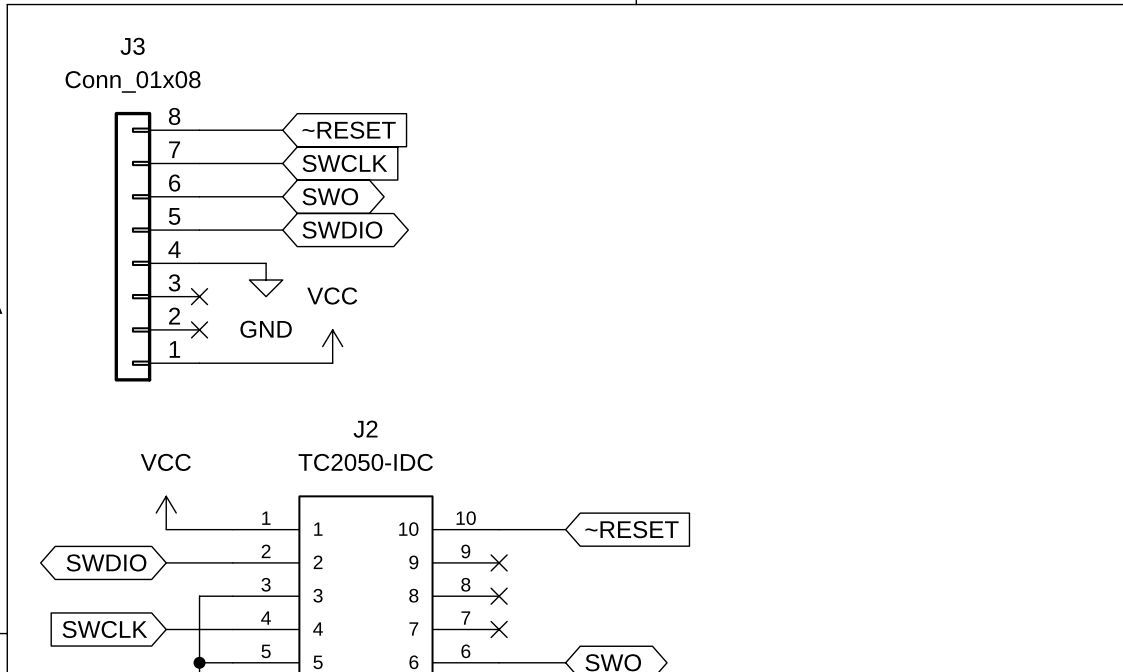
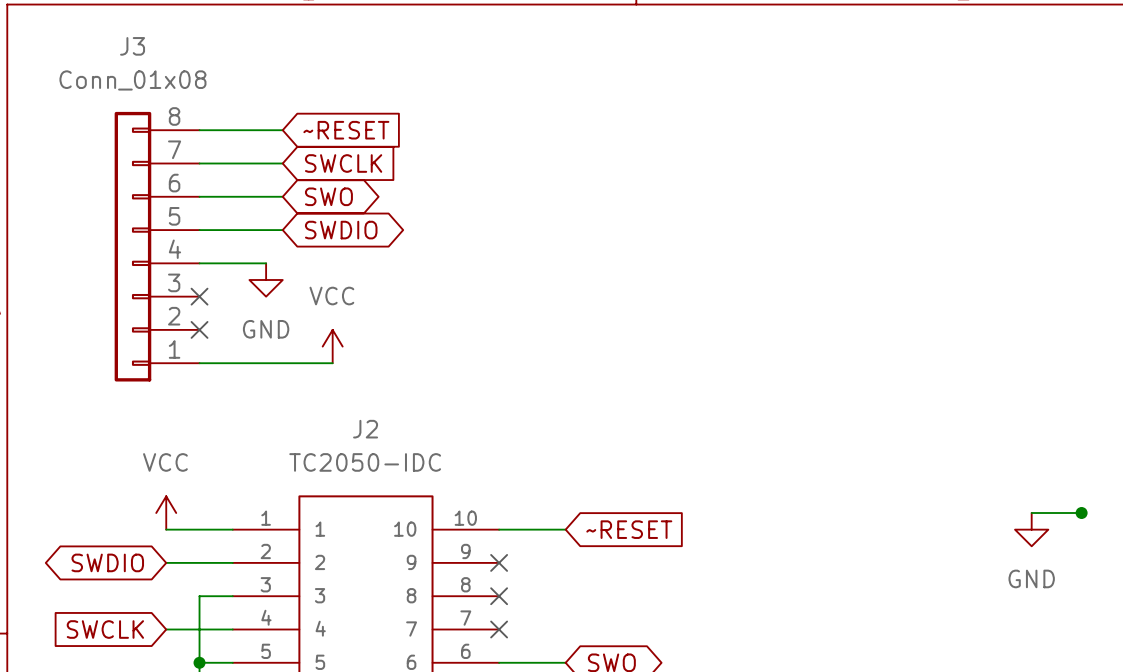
wire: none -> (1031, 513) (1081, 513)
junction: none -> (1081, 513)
power symbol: none -> GND (1031, 529)

